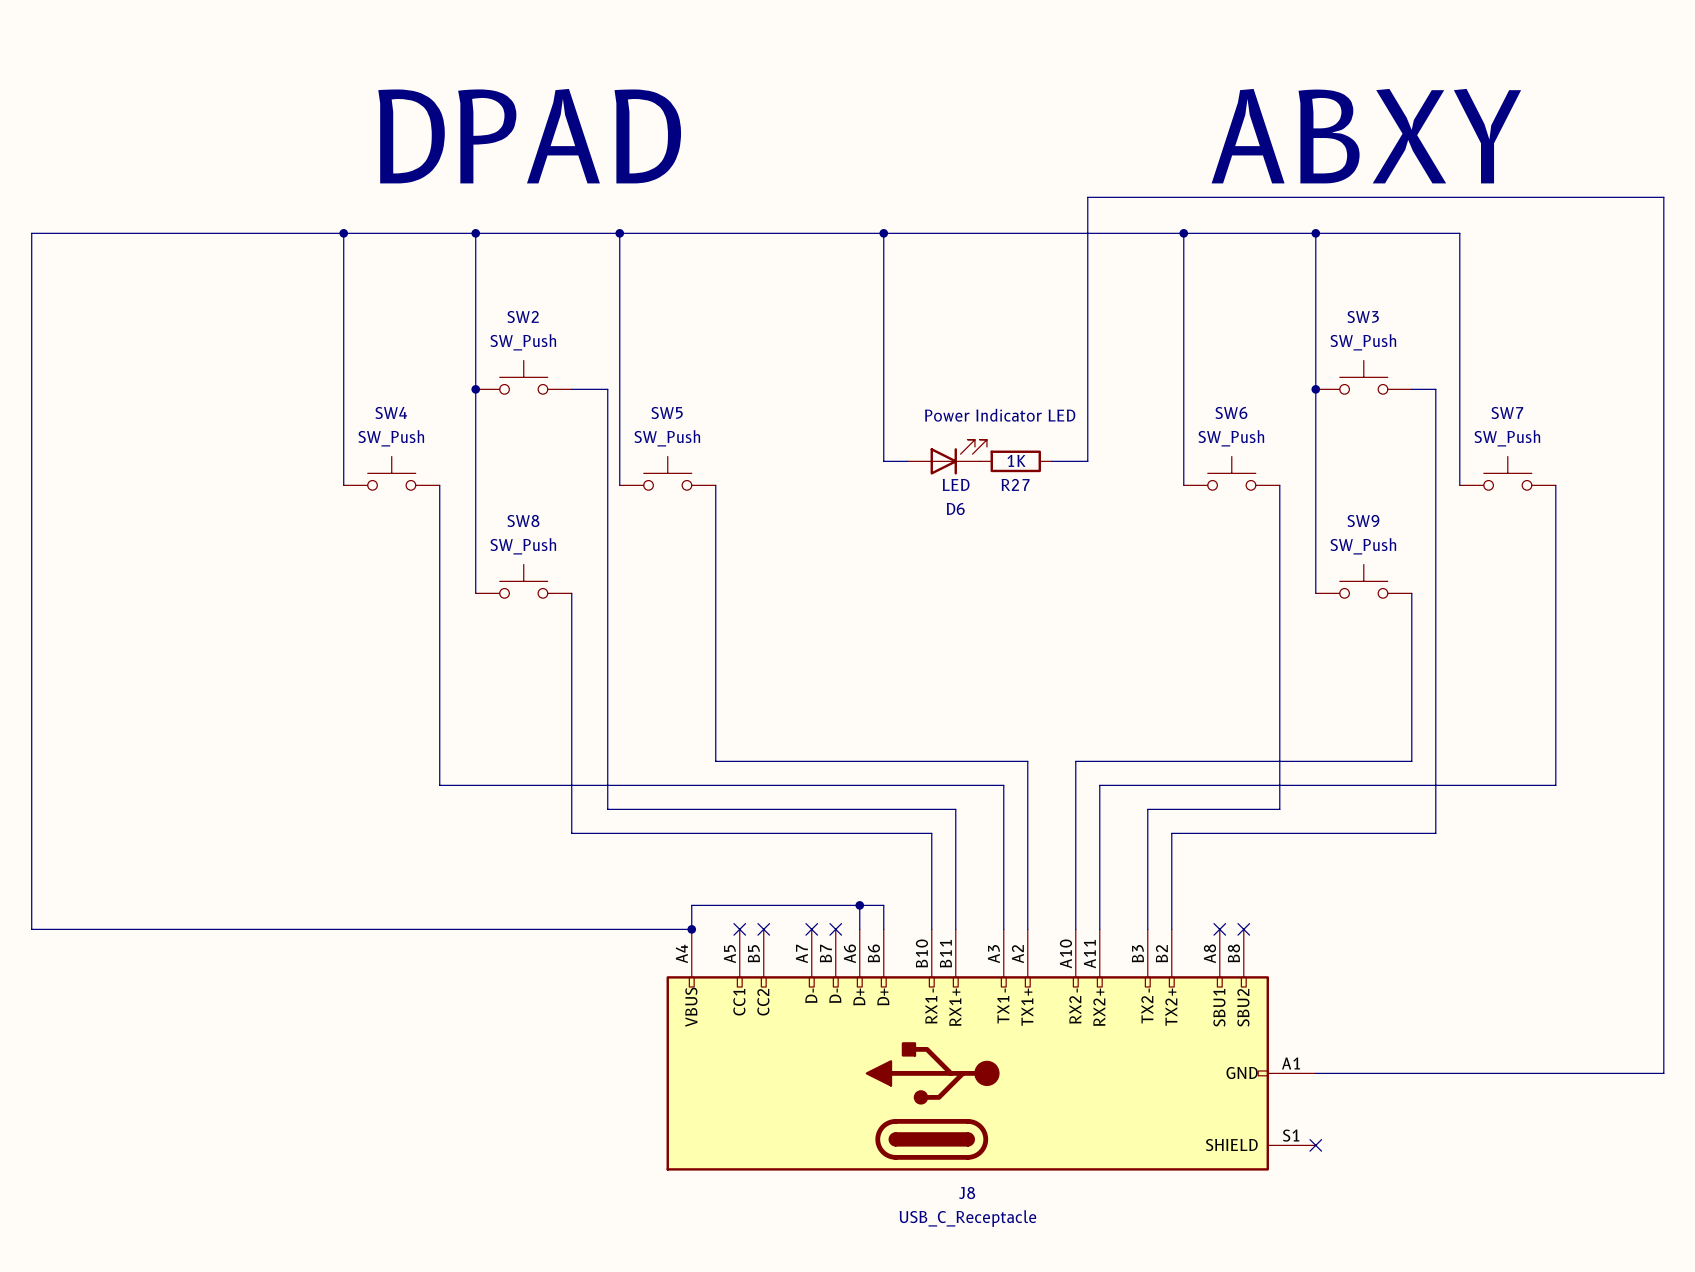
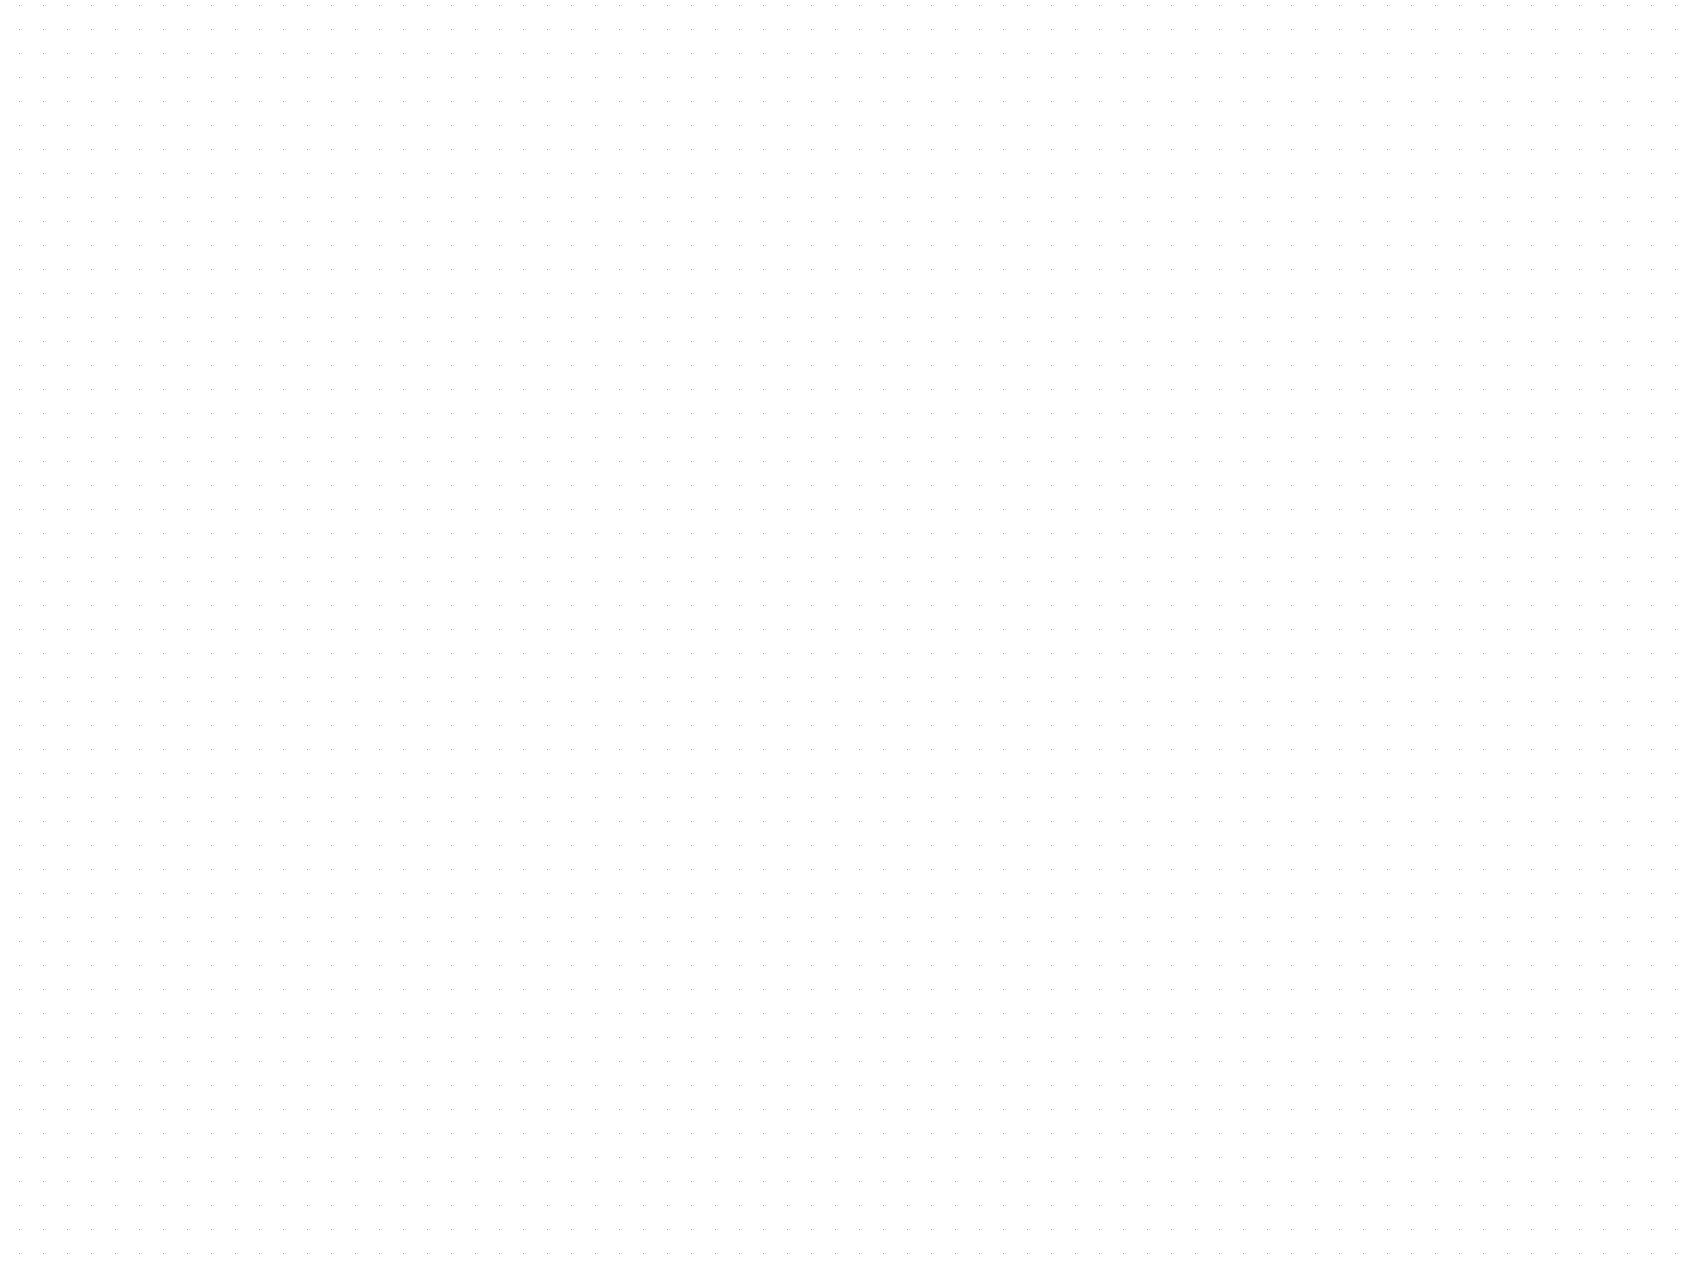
text: DPAD (529, 136) -> none
text: ABXY (1366, 136) -> none
wire: (343, 233) (343, 485) -> none
junction: (343, 233) -> none
wire: (475, 233) (475, 593) -> none
junction: (475, 233) -> none
wire: (619, 233) (619, 485) -> none
junction: (619, 233) -> none
wire: (883, 233) (883, 461) (907, 461) -> none
junction: (883, 233) -> none
wire: (1183, 233) (1183, 485) -> none
junction: (1183, 233) -> none
wire: (1315, 233) (1315, 593) -> none
junction: (1315, 233) -> none
SW2: SW_Push (523, 377) -> none
SW3: SW_Push (1363, 377) -> none
junction: (475, 389) -> none
wire: (571, 389) (607, 389) (607, 809) (955, 809) (955, 929) -> none
junction: (1315, 389) -> none
wire: (1411, 389) (1435, 389) (1435, 833) (1171, 833) (1171, 929) -> none
text: Power Indicator LED (1000, 415) -> none
D6: LED (947, 457) -> none
R27: 1K (1015, 461) -> none
wire: (1051, 461) (1087, 461) (1087, 197) (1663, 197) (1663, 1073) (1315, 1073) -> none
SW4: SW_Push (391, 473) -> none
SW5: SW_Push (667, 473) -> none
SW6: SW_Push (1231, 473) -> none
SW7: SW_Push (1507, 473) -> none
wire: (439, 485) (439, 785) (1003, 785) (1003, 929) -> none
wire: (715, 485) (715, 761) (1027, 761) (1027, 929) -> none
wire: (1279, 485) (1279, 809) (1147, 809) (1147, 929) -> none
wire: (1459, 485) (1459, 233) (31, 233) (31, 929) (691, 929) (691, 905) (883, 905) (883, 929) -> none
wire: (1555, 485) (1555, 785) (1099, 785) (1099, 929) -> none
SW8: SW_Push (523, 581) -> none
SW9: SW_Push (1363, 581) -> none
wire: (571, 593) (571, 833) (931, 833) (931, 929) -> none
wire: (1411, 593) (1411, 761) (1075, 761) (1075, 929) -> none
wire: (859, 905) (859, 929) -> none
junction: (859, 905) -> none
junction: (691, 929) -> none
no-connect mark: (739, 929) -> none
no-connect mark: (763, 929) -> none
no-connect mark: (811, 929) -> none
no-connect mark: (835, 929) -> none
no-connect mark: (1219, 929) -> none
no-connect mark: (1243, 929) -> none
J8: USB_C_Receptacle (991, 1049) -> none
no-connect mark: (1315, 1145) -> none

